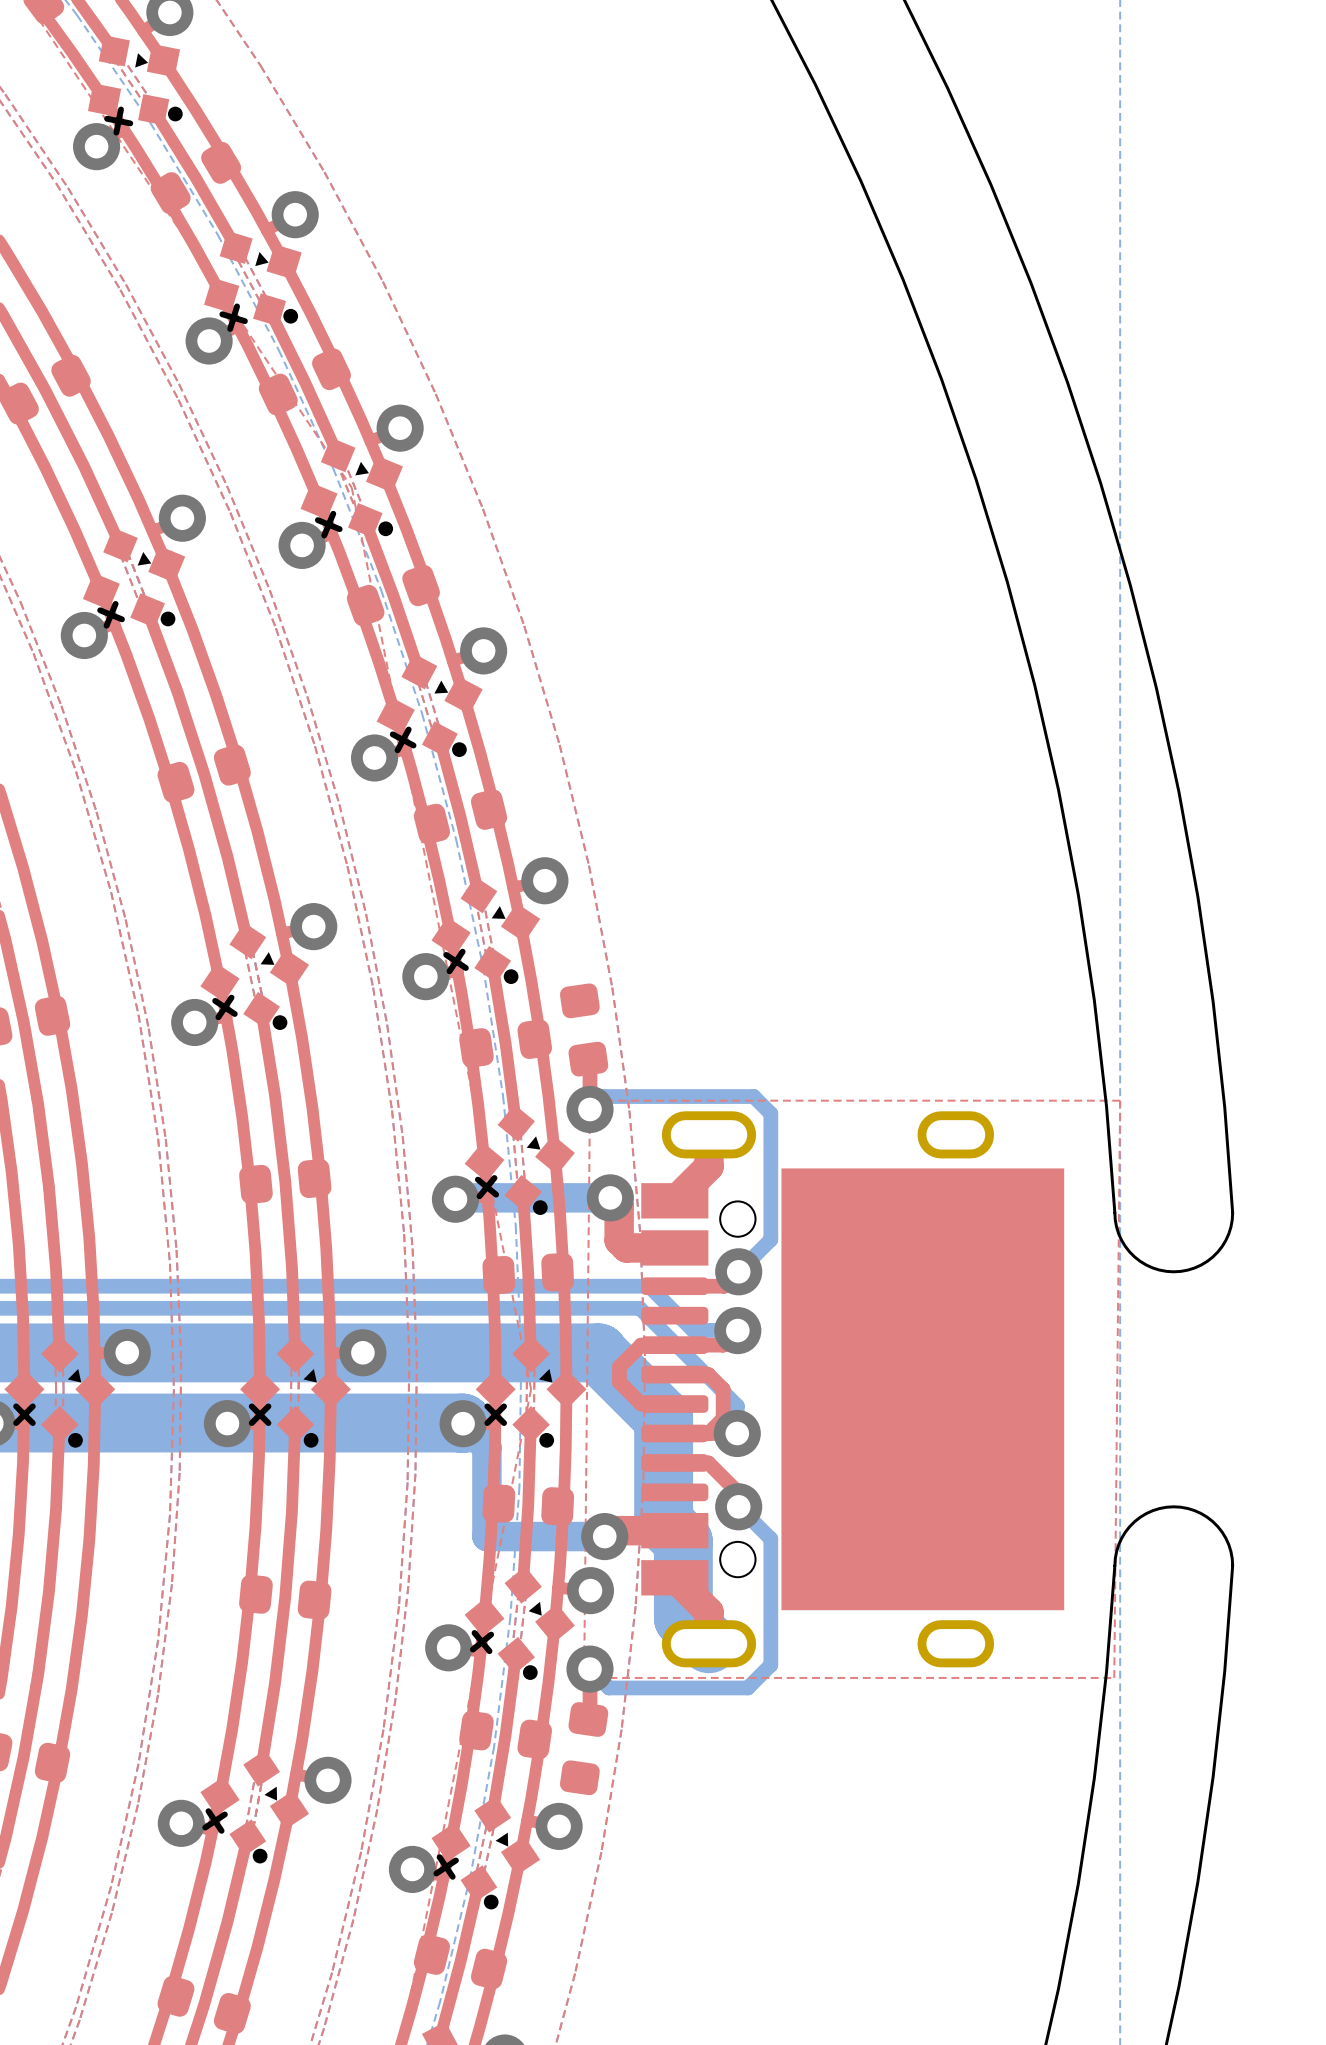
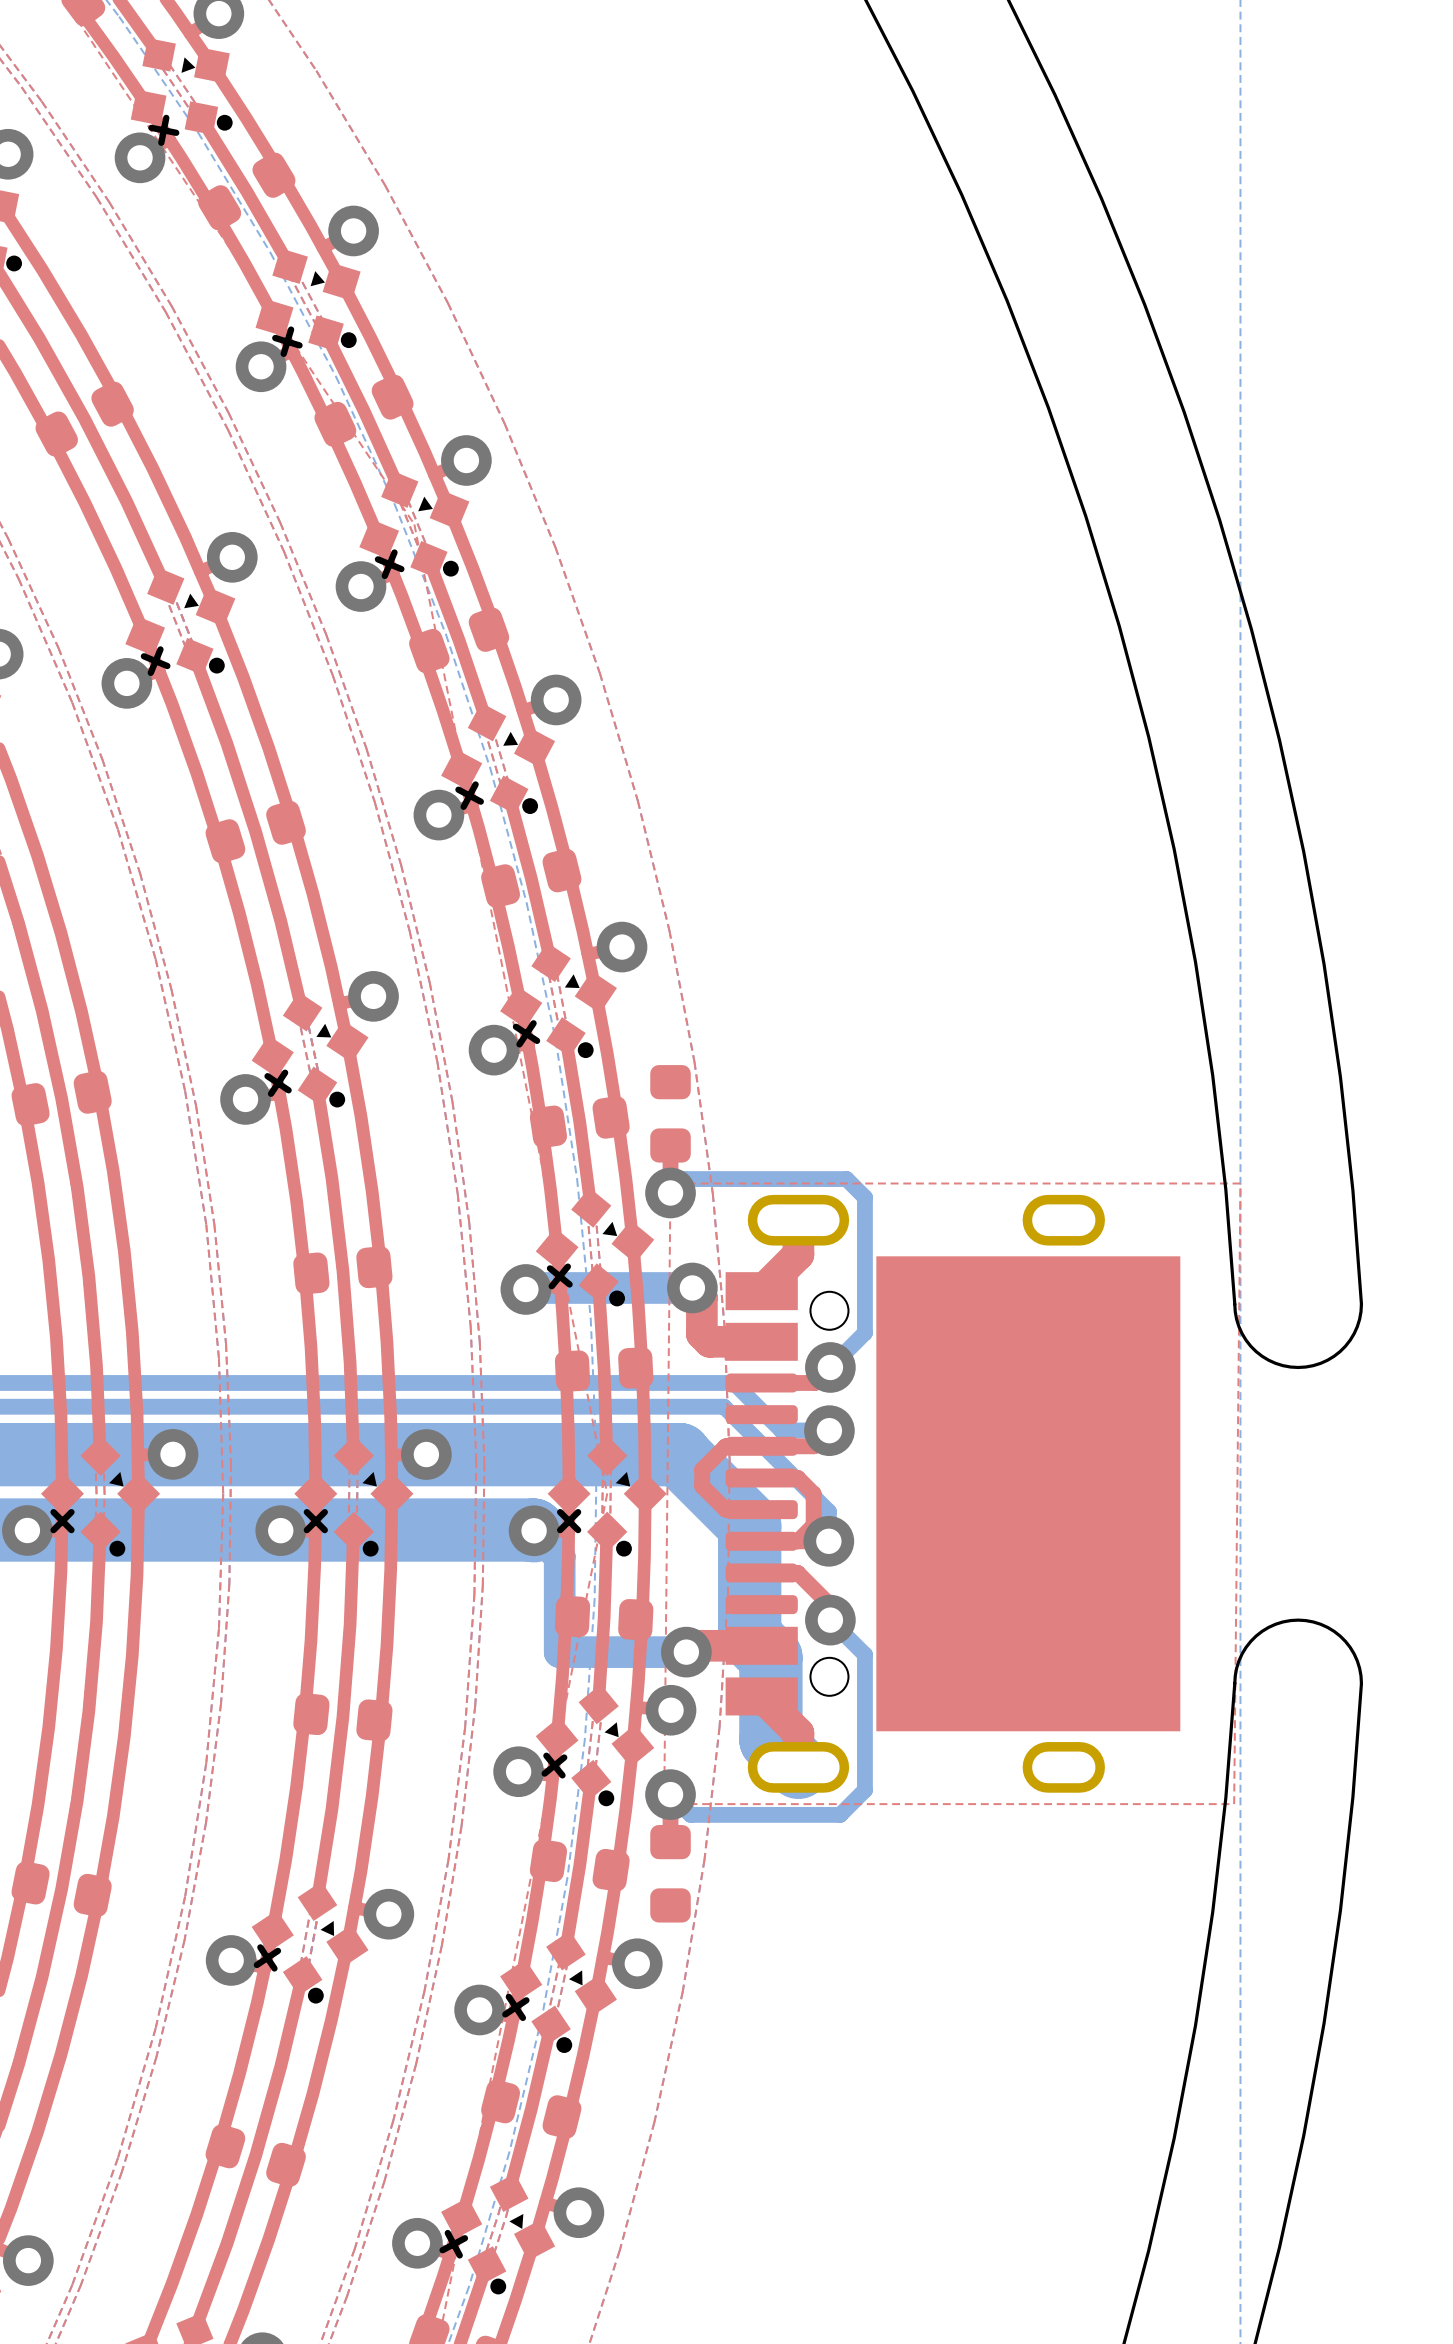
part rotation: 0° (584, 1029) -> 8.3° clockwise (670, 1113)
part rotation: 0° (584, 1748) -> 8.3° counterclockwise (670, 1873)

